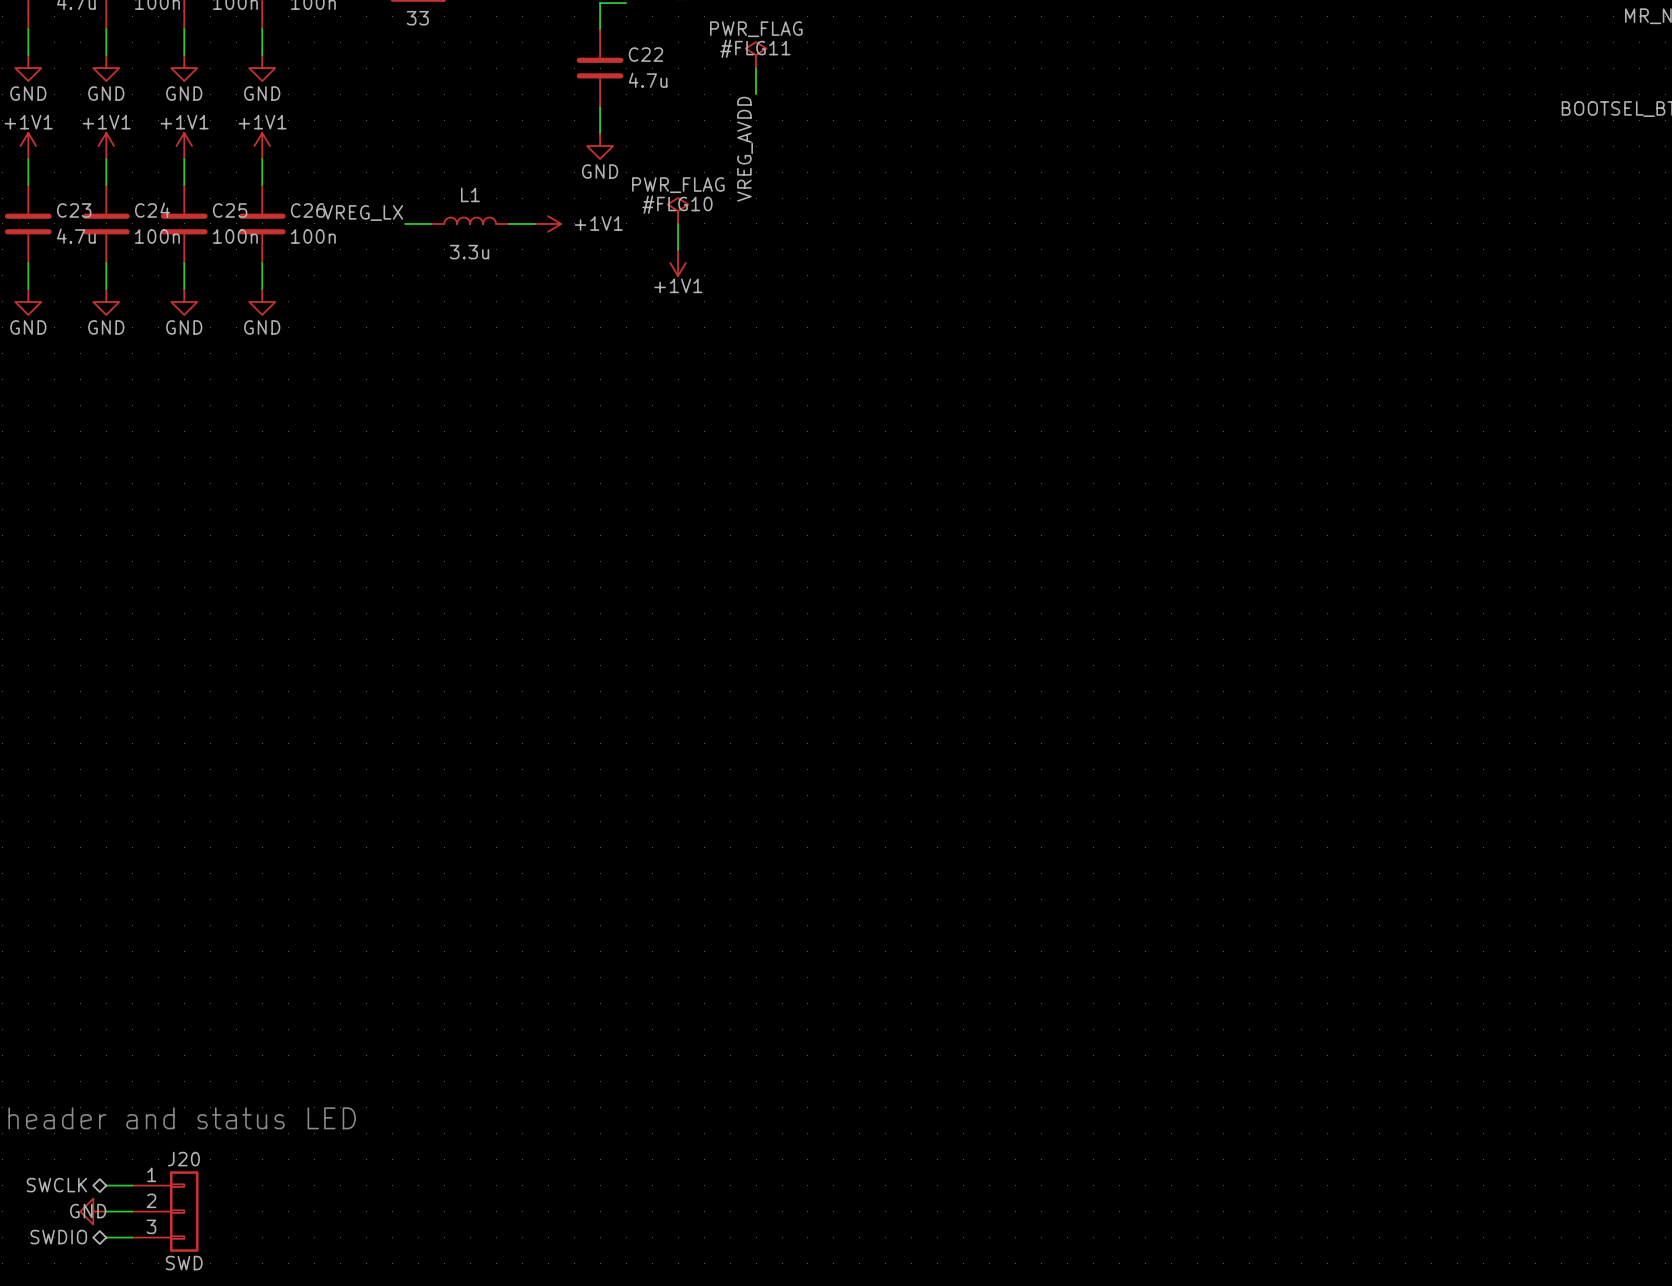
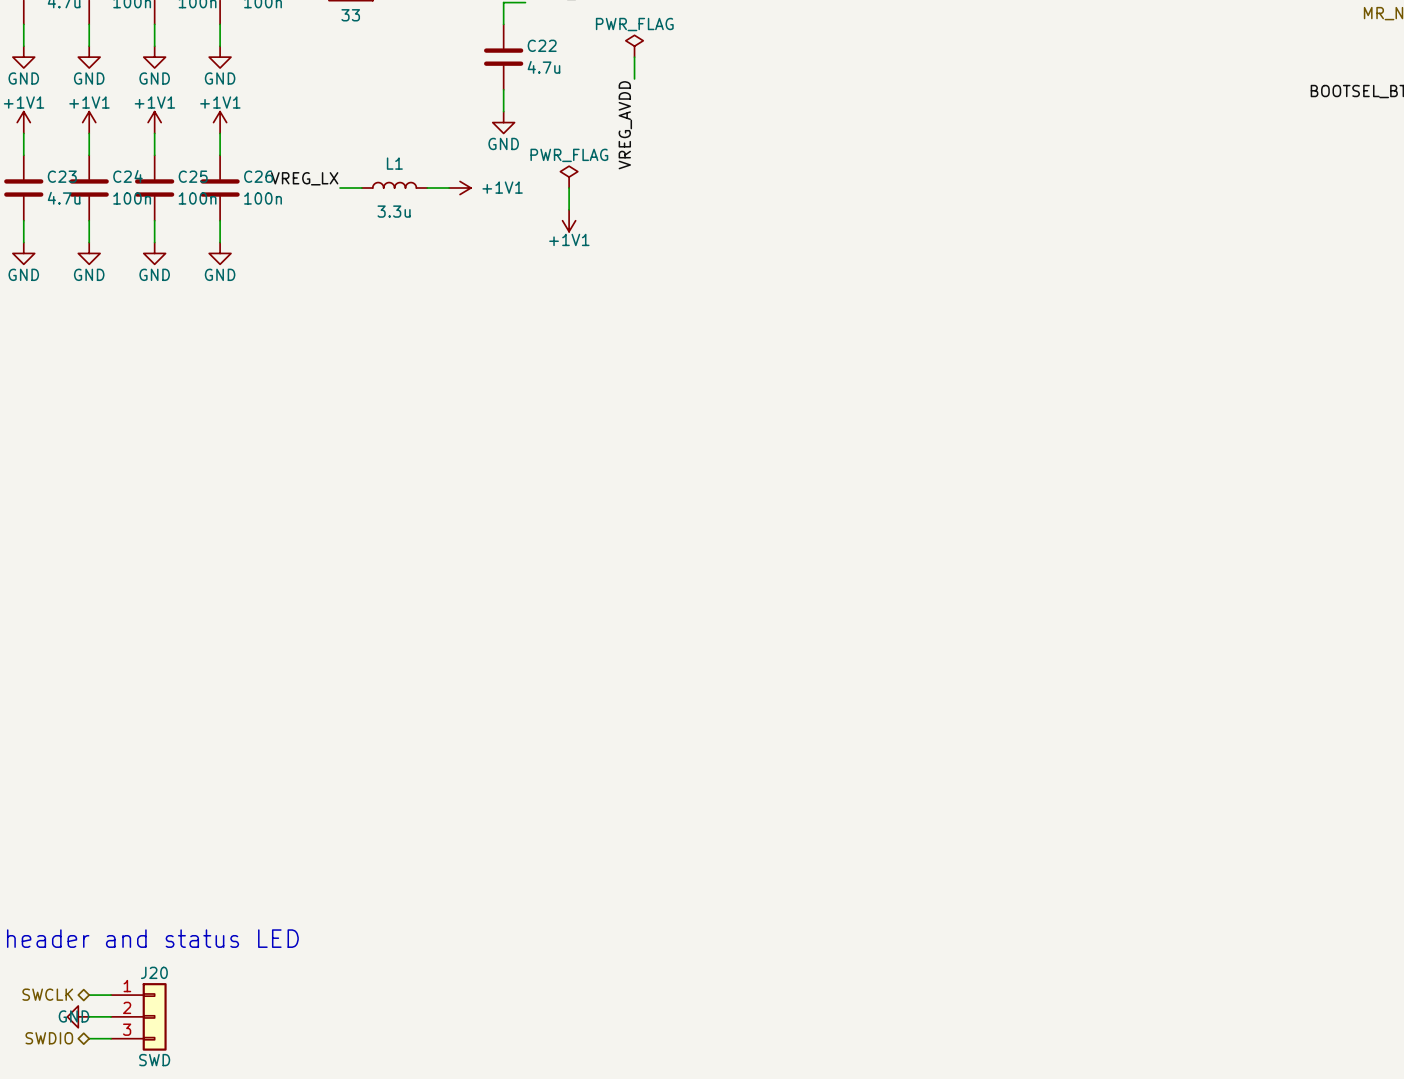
#FLG11 name: #FLG11 (755, 48) -> none
#FLG10 name: #FLG10 (677, 204) -> none

